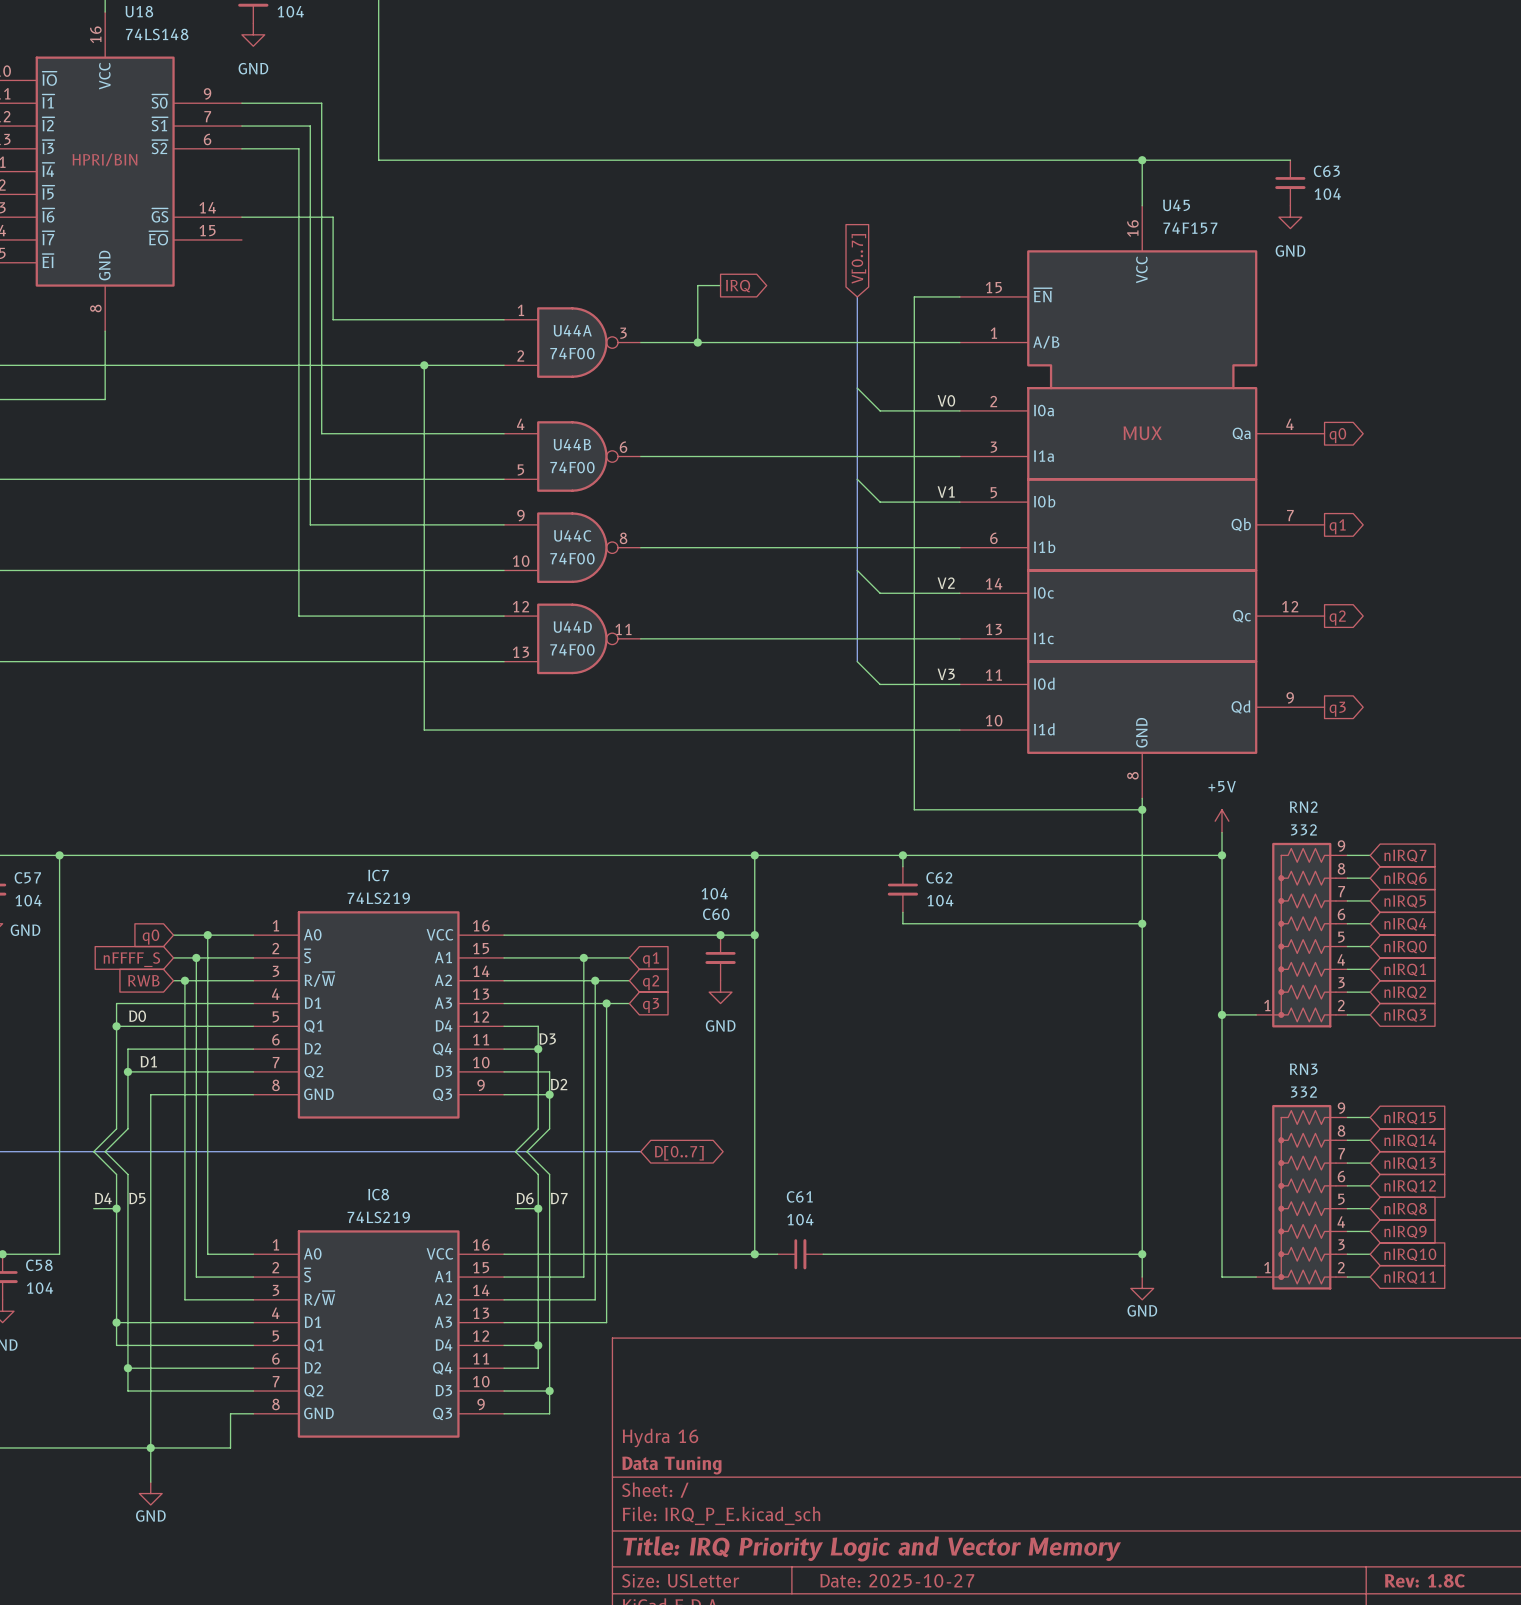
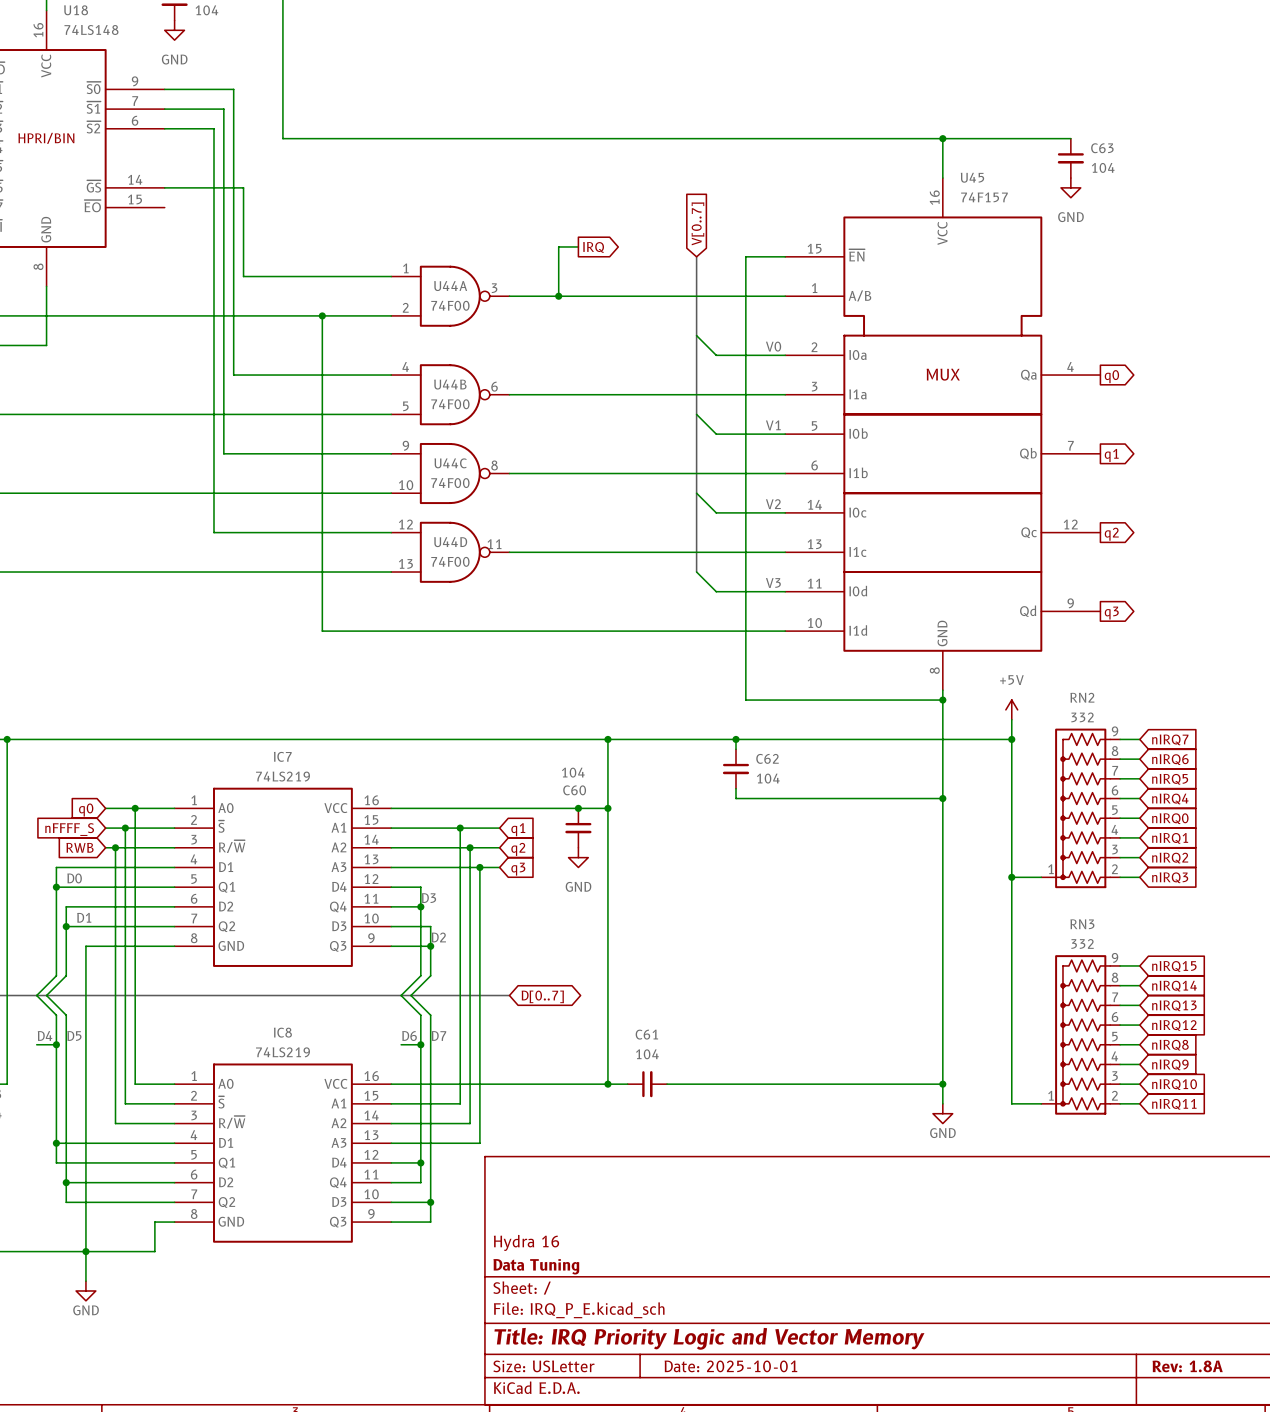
title block: Date: 2025-10-27 (897, 1580) -> Date: 2025-10-01 (730, 1366)
title block: Rev: 1.8C (1424, 1580) -> Rev: 1.8A (1187, 1366)

